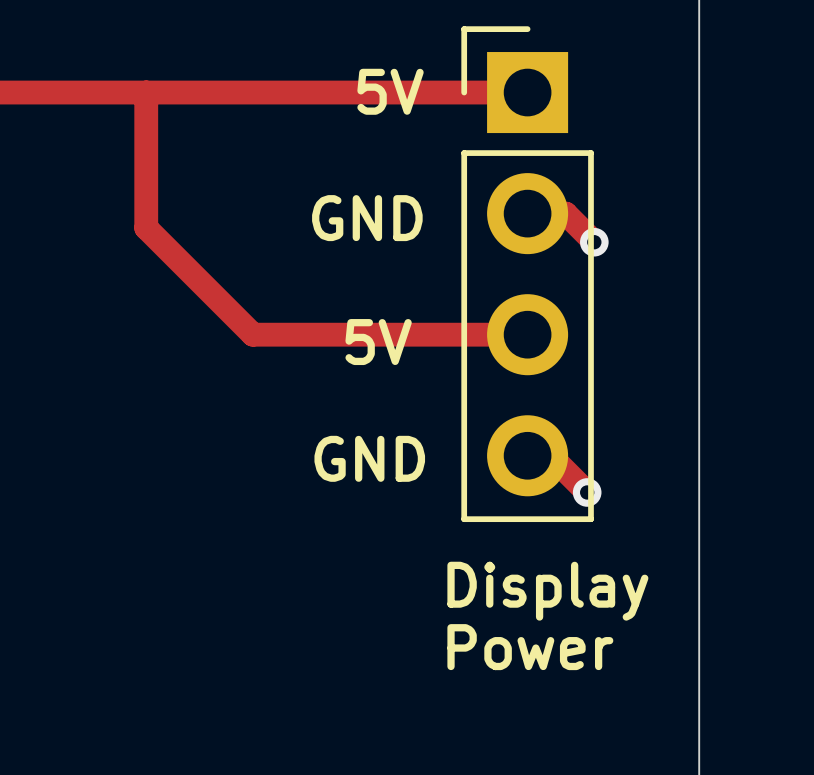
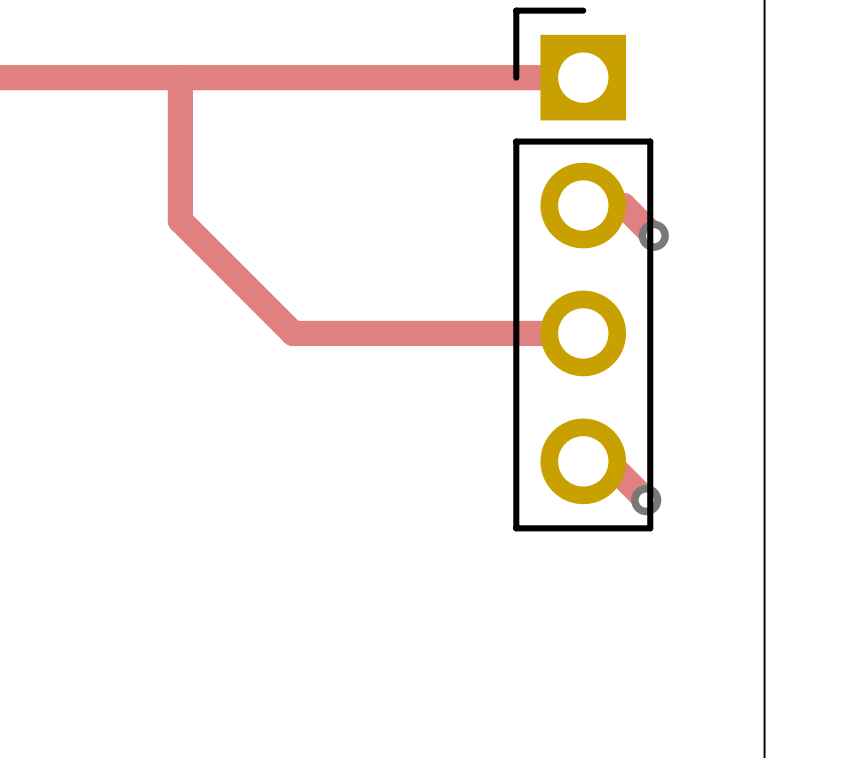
text: 5V (390, 91) -> none
text: GND (367, 218) -> none
text: 5V (378, 342) -> none
text: GND (369, 458) -> none
text: Display (547, 591) -> none
text: Power (530, 647) -> none

